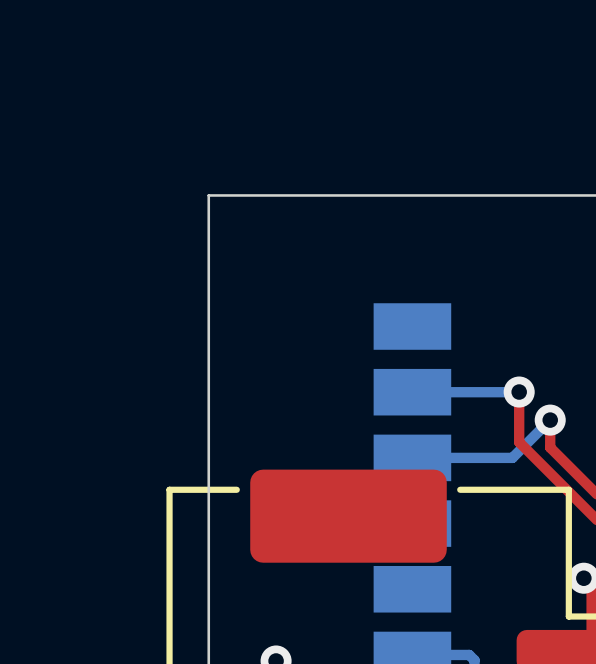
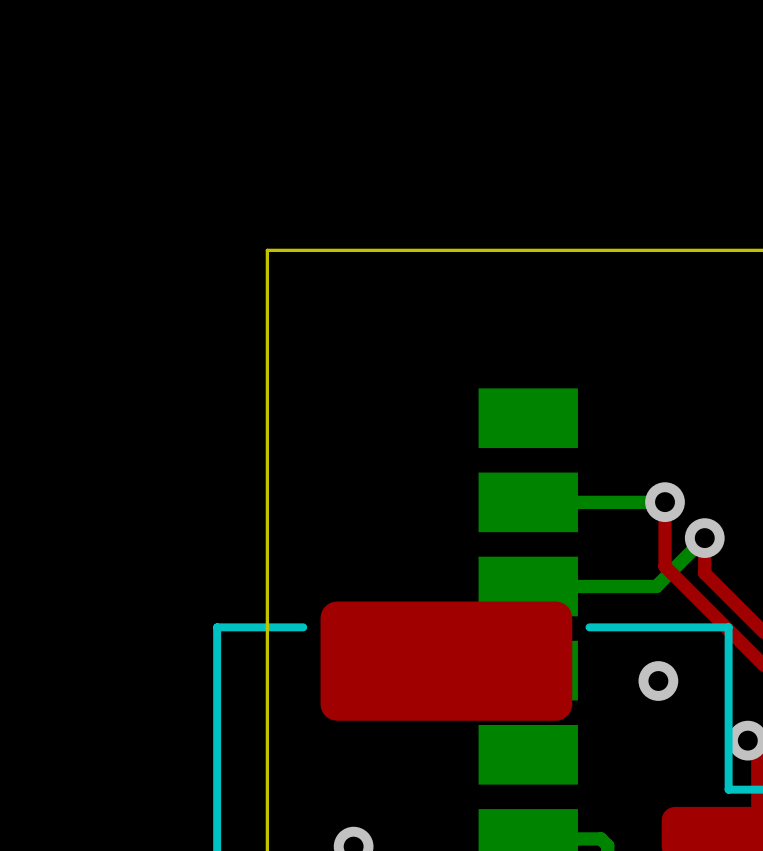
via: none -> (658, 681)

